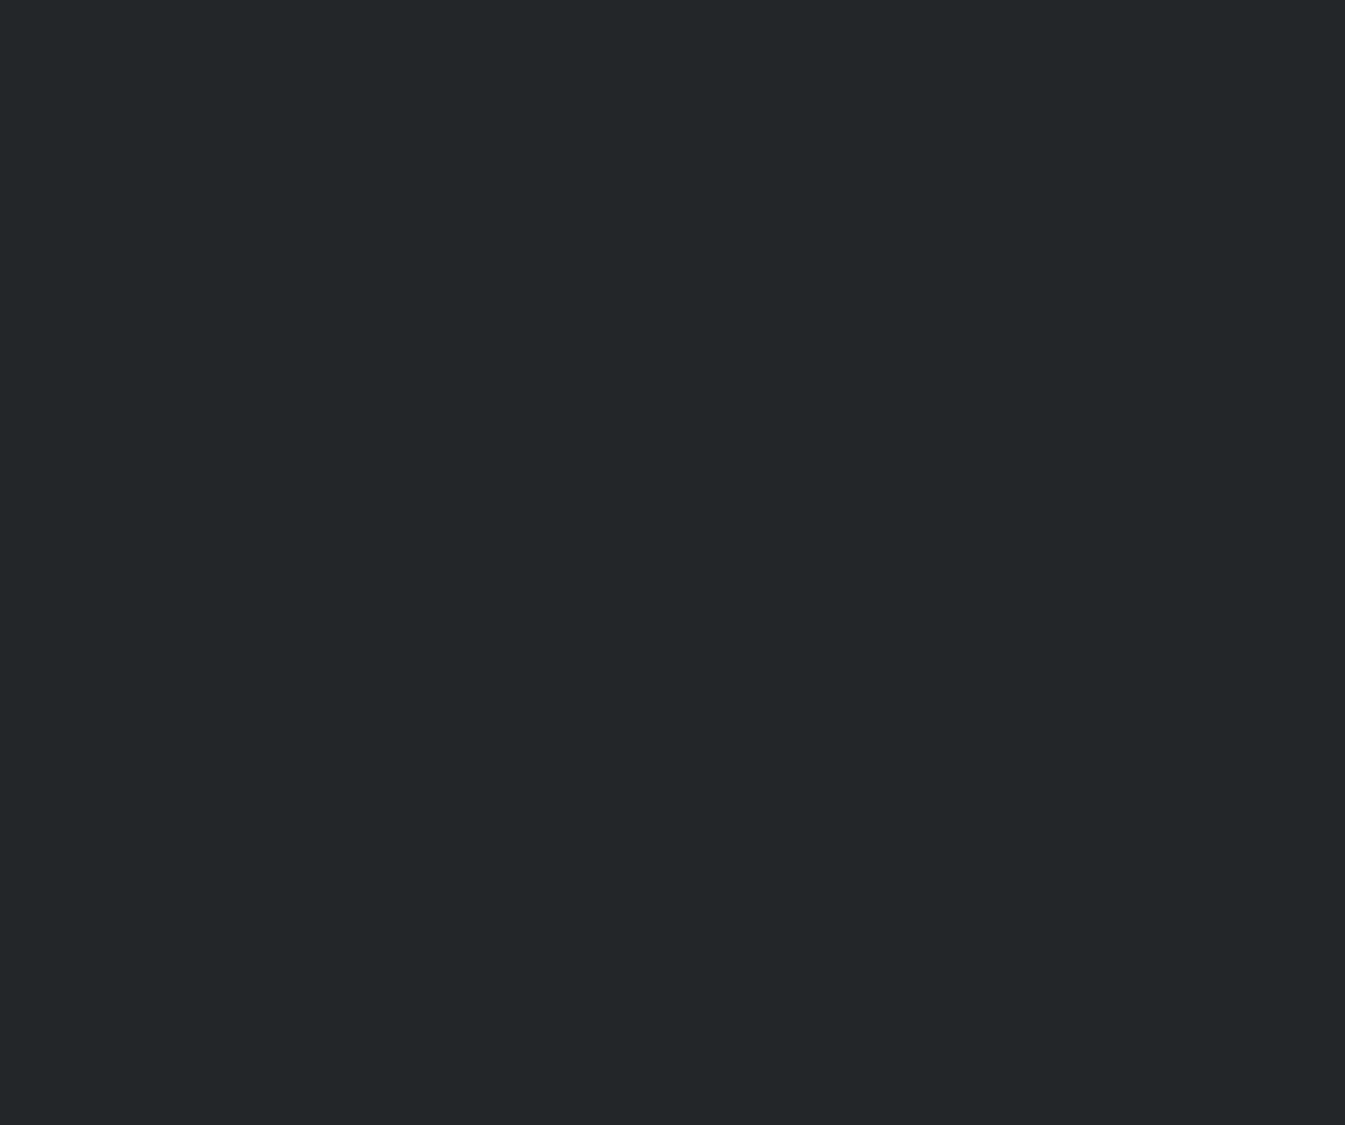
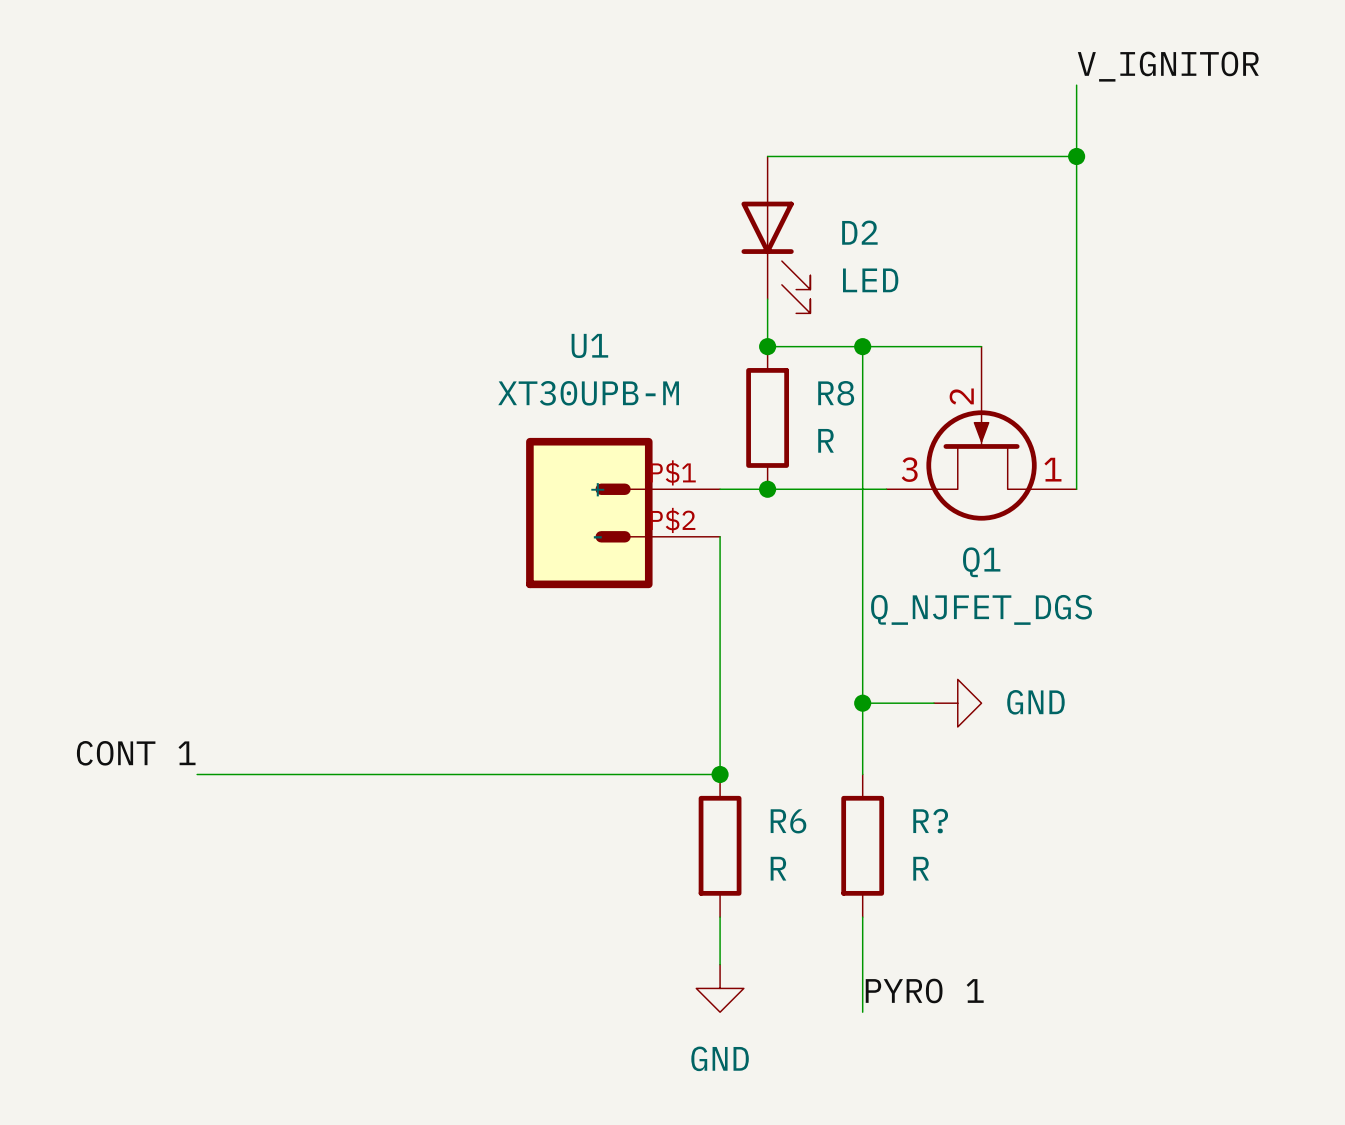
label: none -> V_IGNITOR (1168, 66)
wire: none -> (1076, 85) (1076, 489)
wire: none -> (767, 156) (1076, 156)
junction: none -> (1076, 156)
D2: none -> LED (775, 234)
wire: none -> (767, 299) (767, 346) (981, 346)
junction: none -> (767, 346)
wire: none -> (862, 346) (862, 774)
junction: none -> (862, 346)
R8: none -> R (767, 417)
Q1: none -> Q_NJFET_DGS (981, 433)
wire: none -> (720, 489) (886, 489)
junction: none -> (767, 489)
U1: none -> XT30UPB-M (623, 513)
wire: none -> (720, 536) (720, 774) (197, 774)
wire: none -> (862, 703) (933, 703)
junction: none -> (862, 703)
power symbol: none -> GND (957, 703)
label: none -> CONT 1 (136, 753)
junction: none -> (720, 774)
R6: none -> R (720, 845)
R?: none -> R (862, 845)
wire: none -> (720, 917) (720, 964)
wire: none -> (862, 917) (862, 1012)
power symbol: none -> GND (720, 988)
label: none -> PYRO 1 (924, 990)

